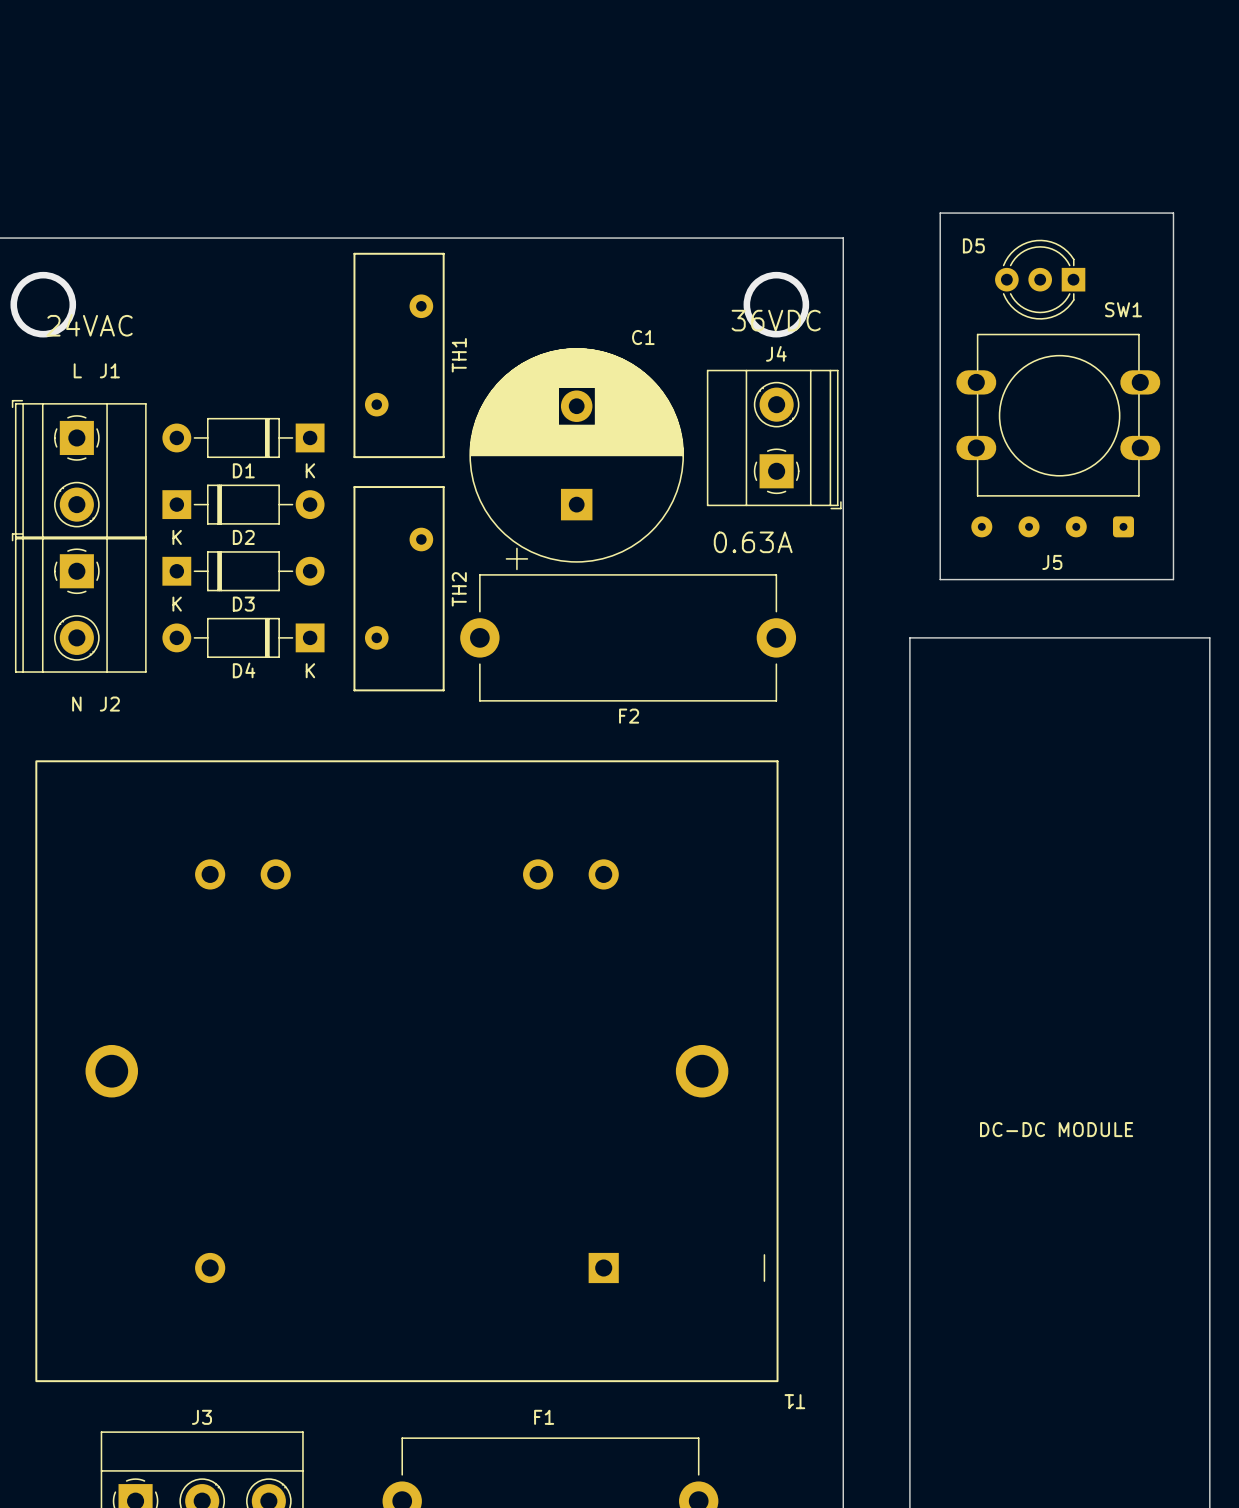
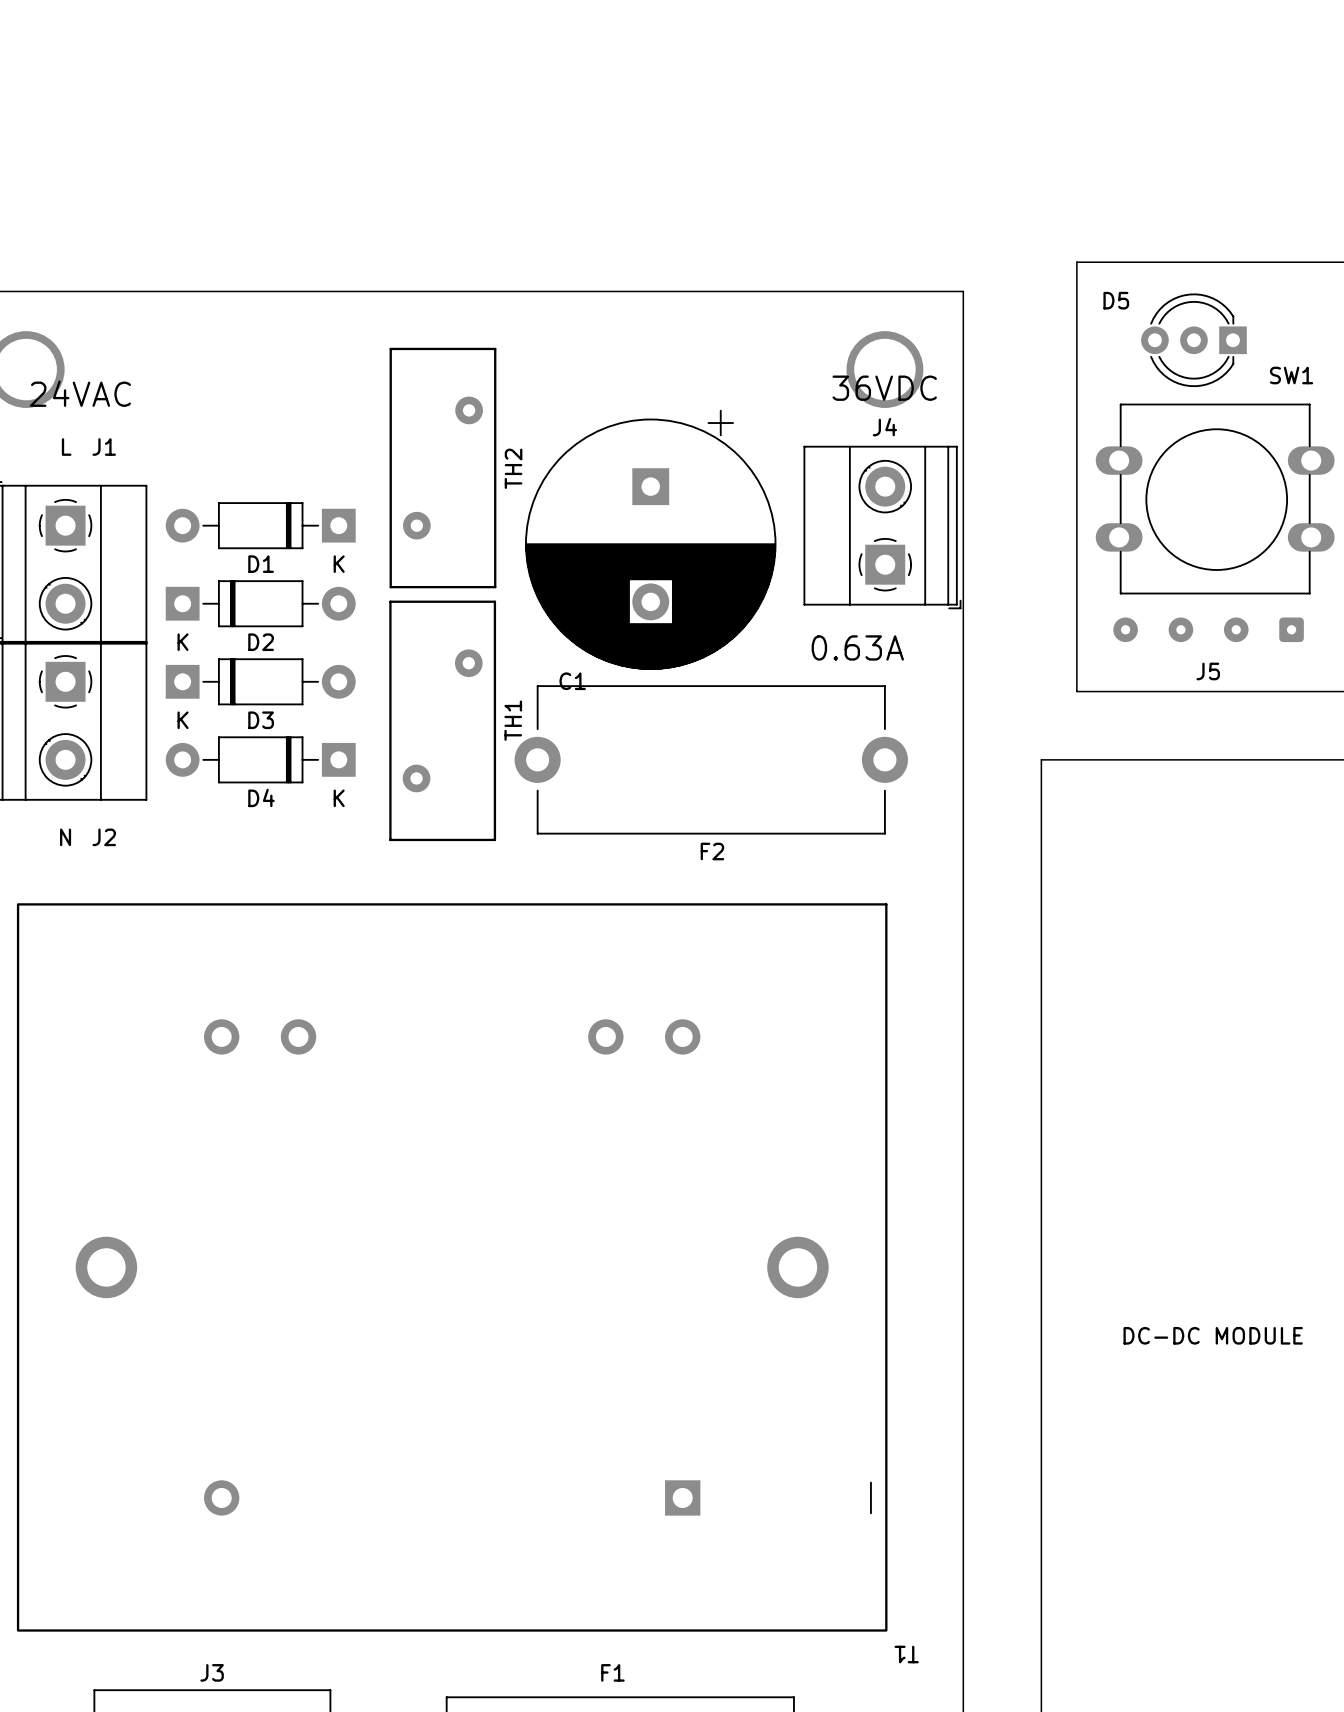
TH1 position: (399, 355) -> (442, 720)
C1 rotation: 0° (576, 459) -> 180° (650, 539)
TH2 position: (399, 588) -> (442, 468)

